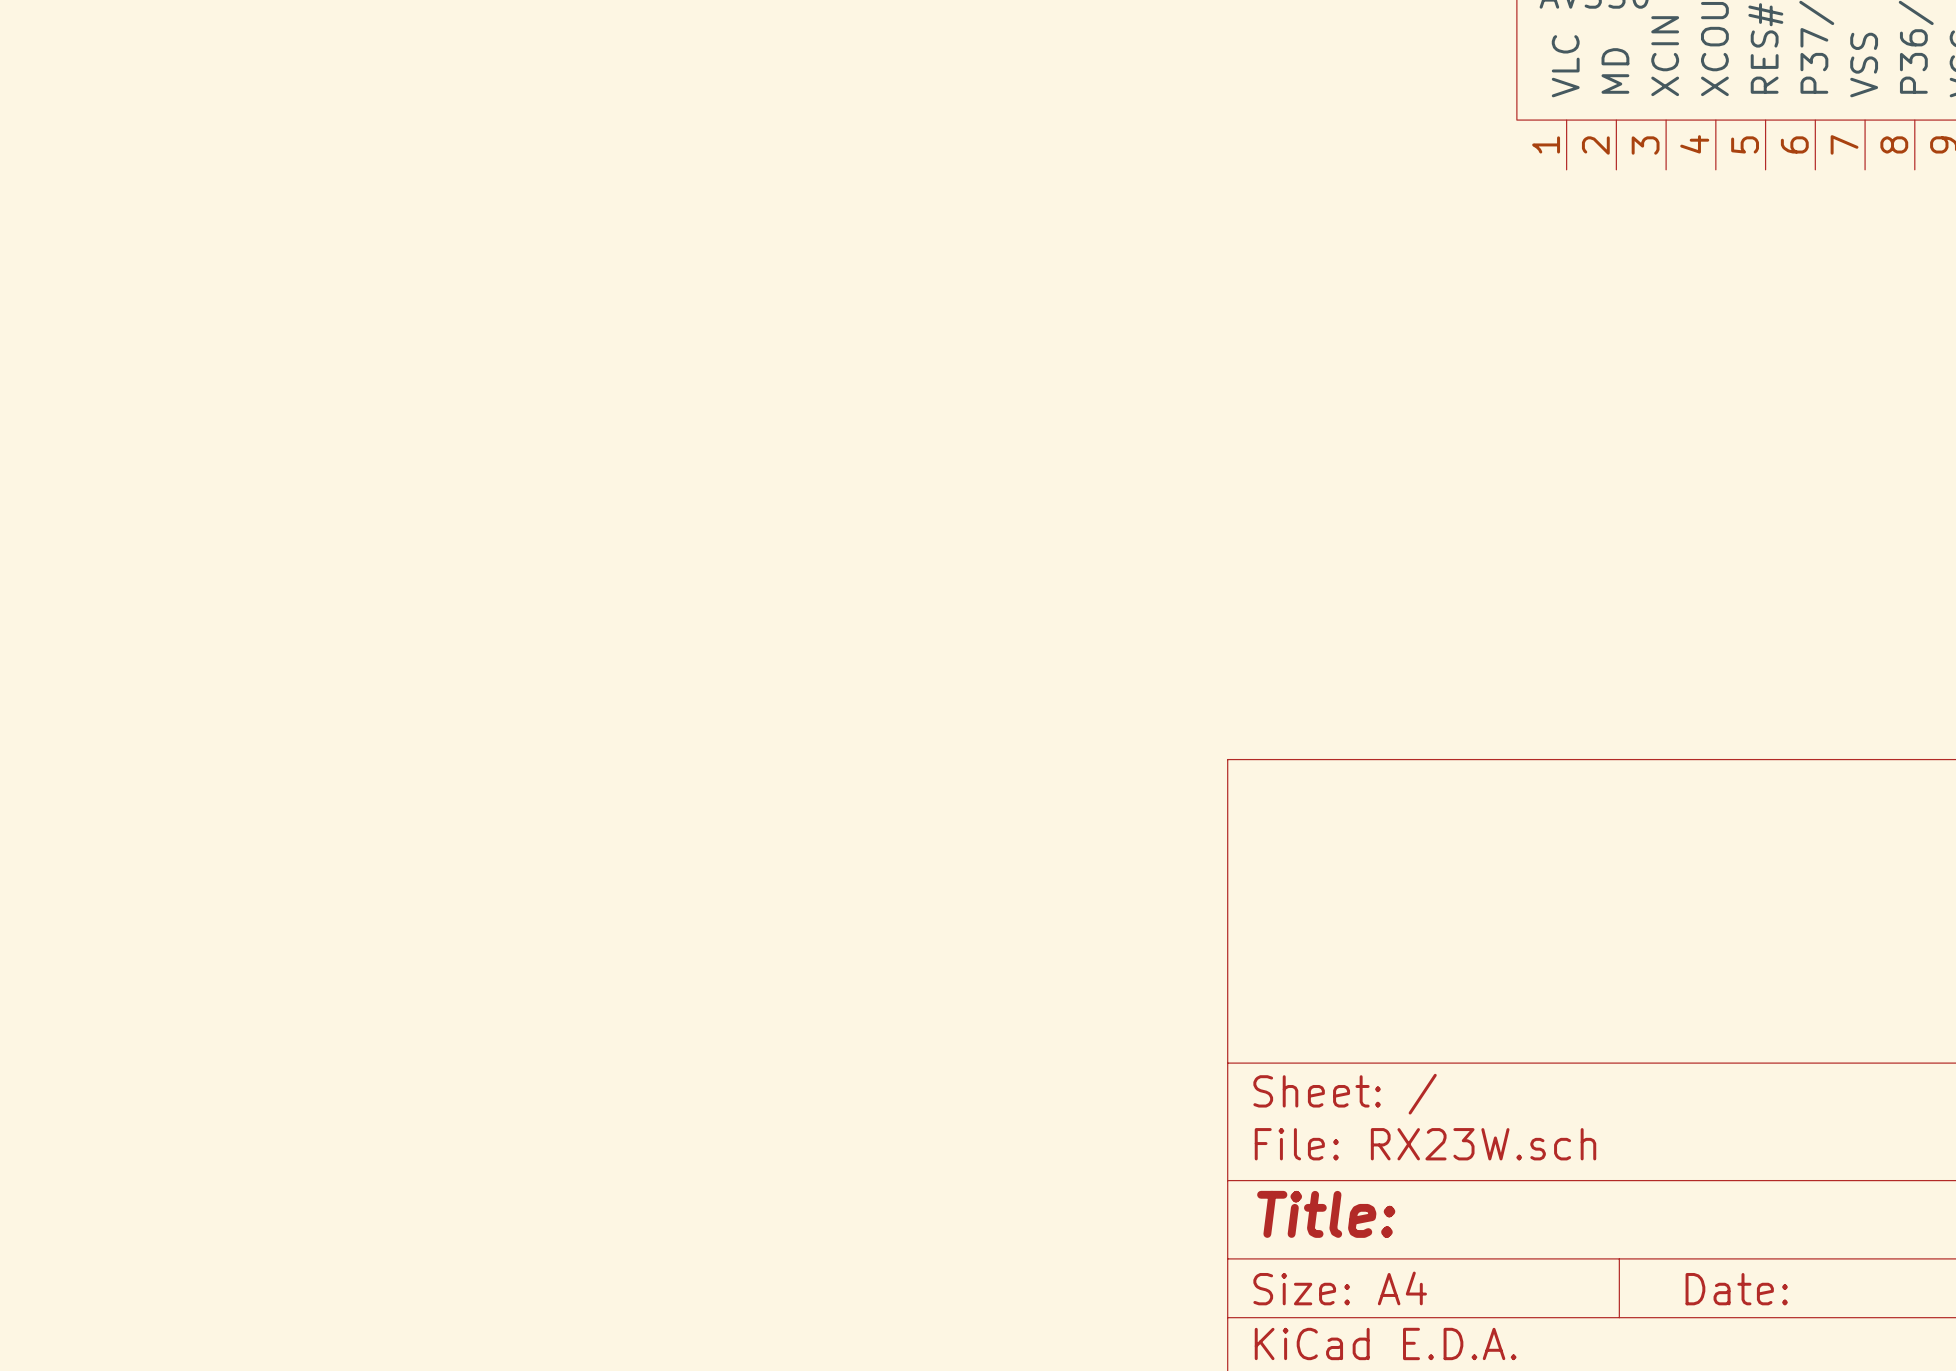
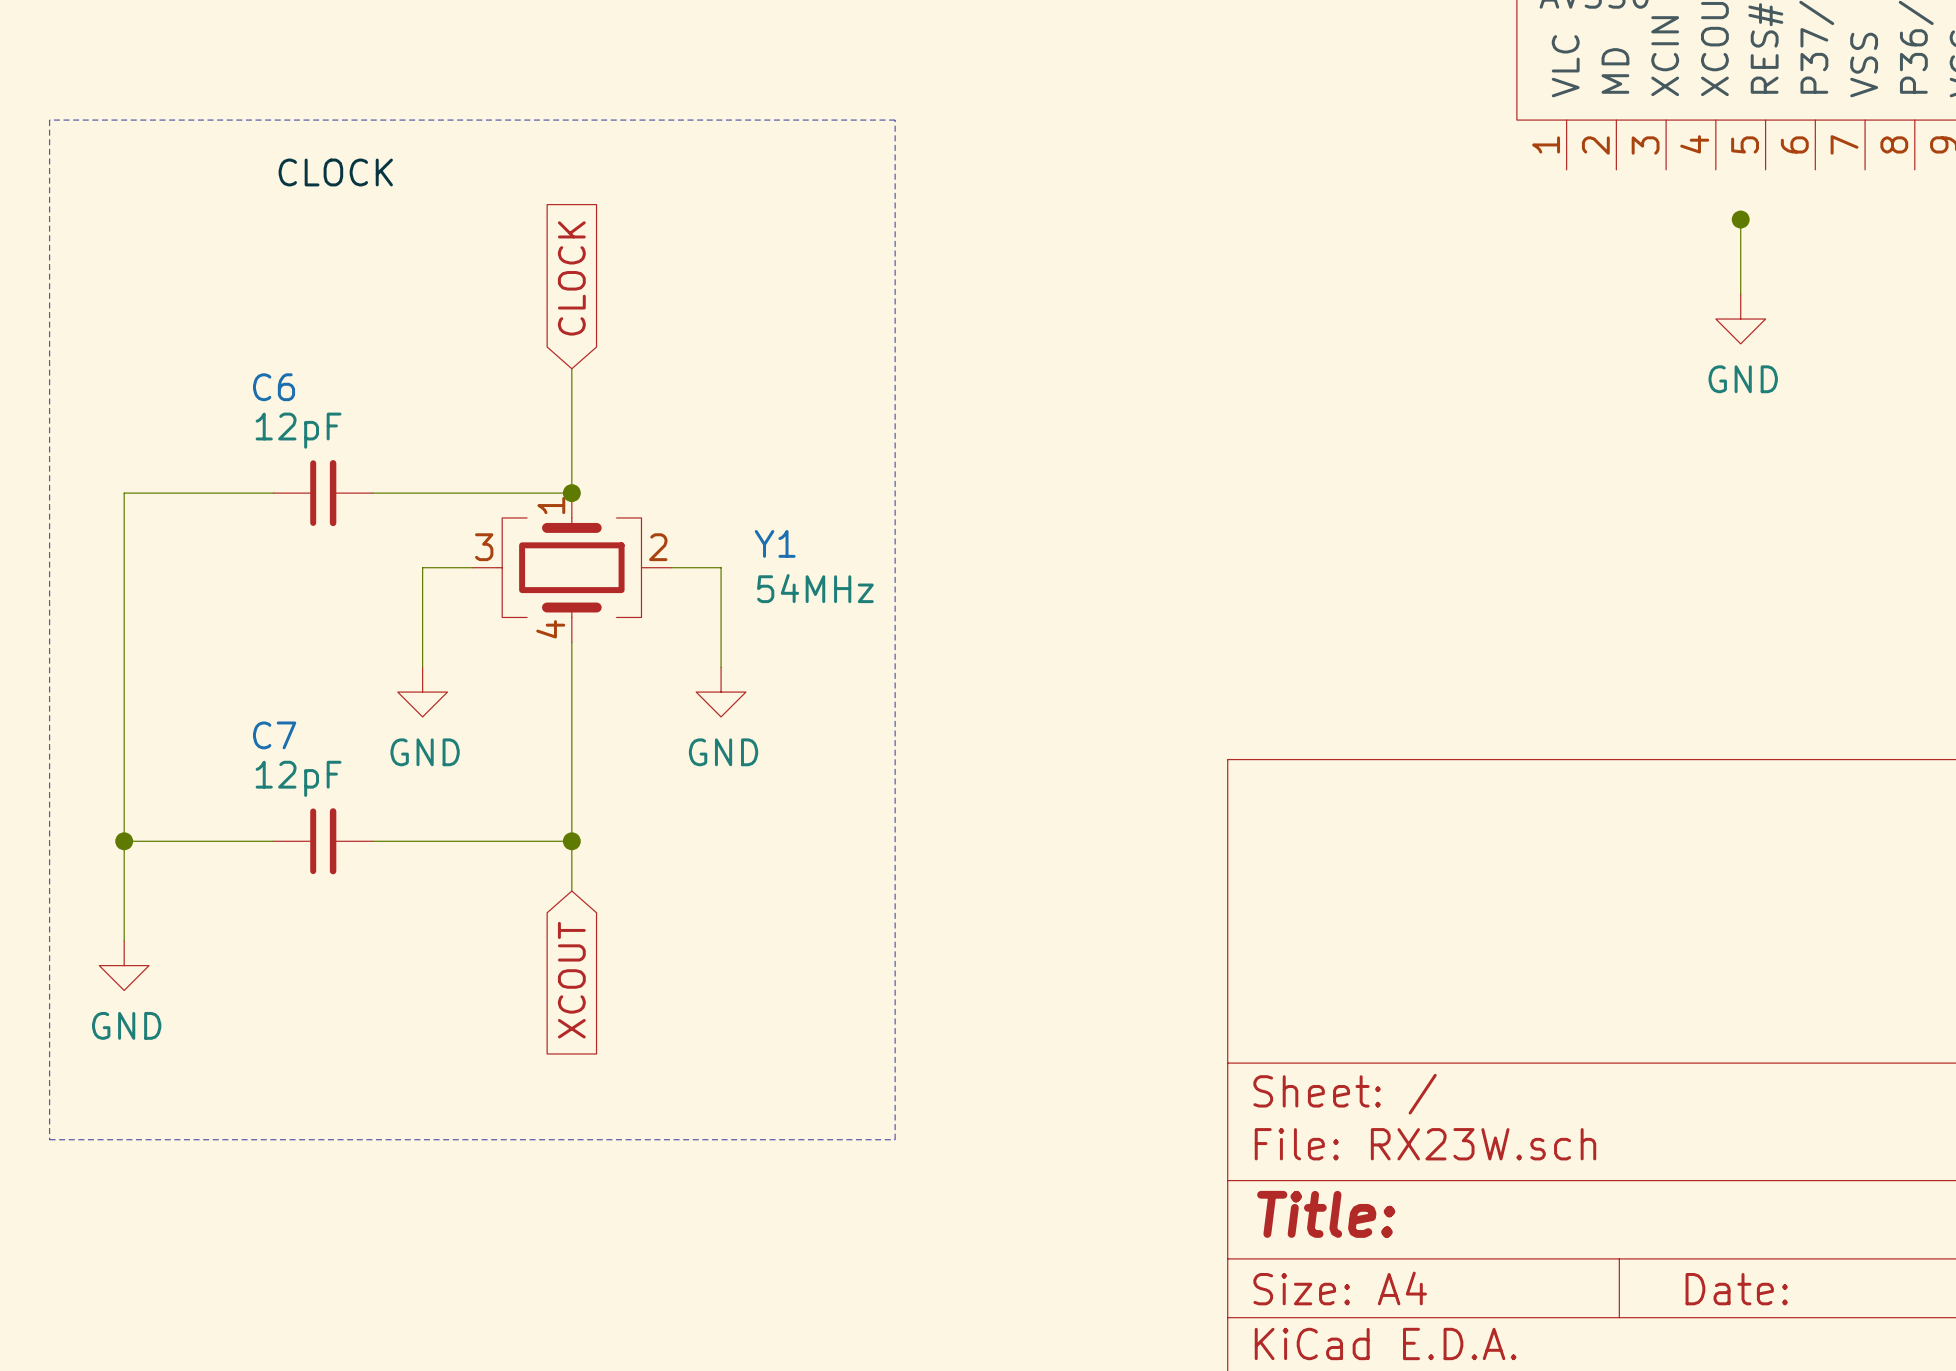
line: none -> (49, 120) (895, 120) (895, 1139) (49, 1139) (49, 120)
label: none -> CLOCK (335, 172)
wire: none -> (1740, 219) (1740, 294)
junction: none -> (1740, 219)
global label: none -> CLOCK (571, 278)
power symbol: none -> GND (1740, 319)
wire: none -> (571, 368) (571, 493) (372, 493)
wire: none -> (273, 493) (124, 493) (124, 940)
C6: none -> 12pF (323, 493)
junction: none -> (571, 493)
wire: none -> (472, 567) (422, 567) (422, 667)
Y1: none -> 54MHz (571, 567)
wire: none -> (671, 567) (721, 567) (721, 667)
wire: none -> (571, 642) (571, 891)
power symbol: none -> GND (422, 692)
power symbol: none -> GND (721, 692)
wire: none -> (124, 841) (273, 841)
junction: none -> (124, 841)
C7: none -> 12pF (323, 841)
wire: none -> (372, 841) (571, 841)
junction: none -> (571, 841)
power symbol: none -> GND (124, 965)
global label: none -> XCOUT (571, 980)

